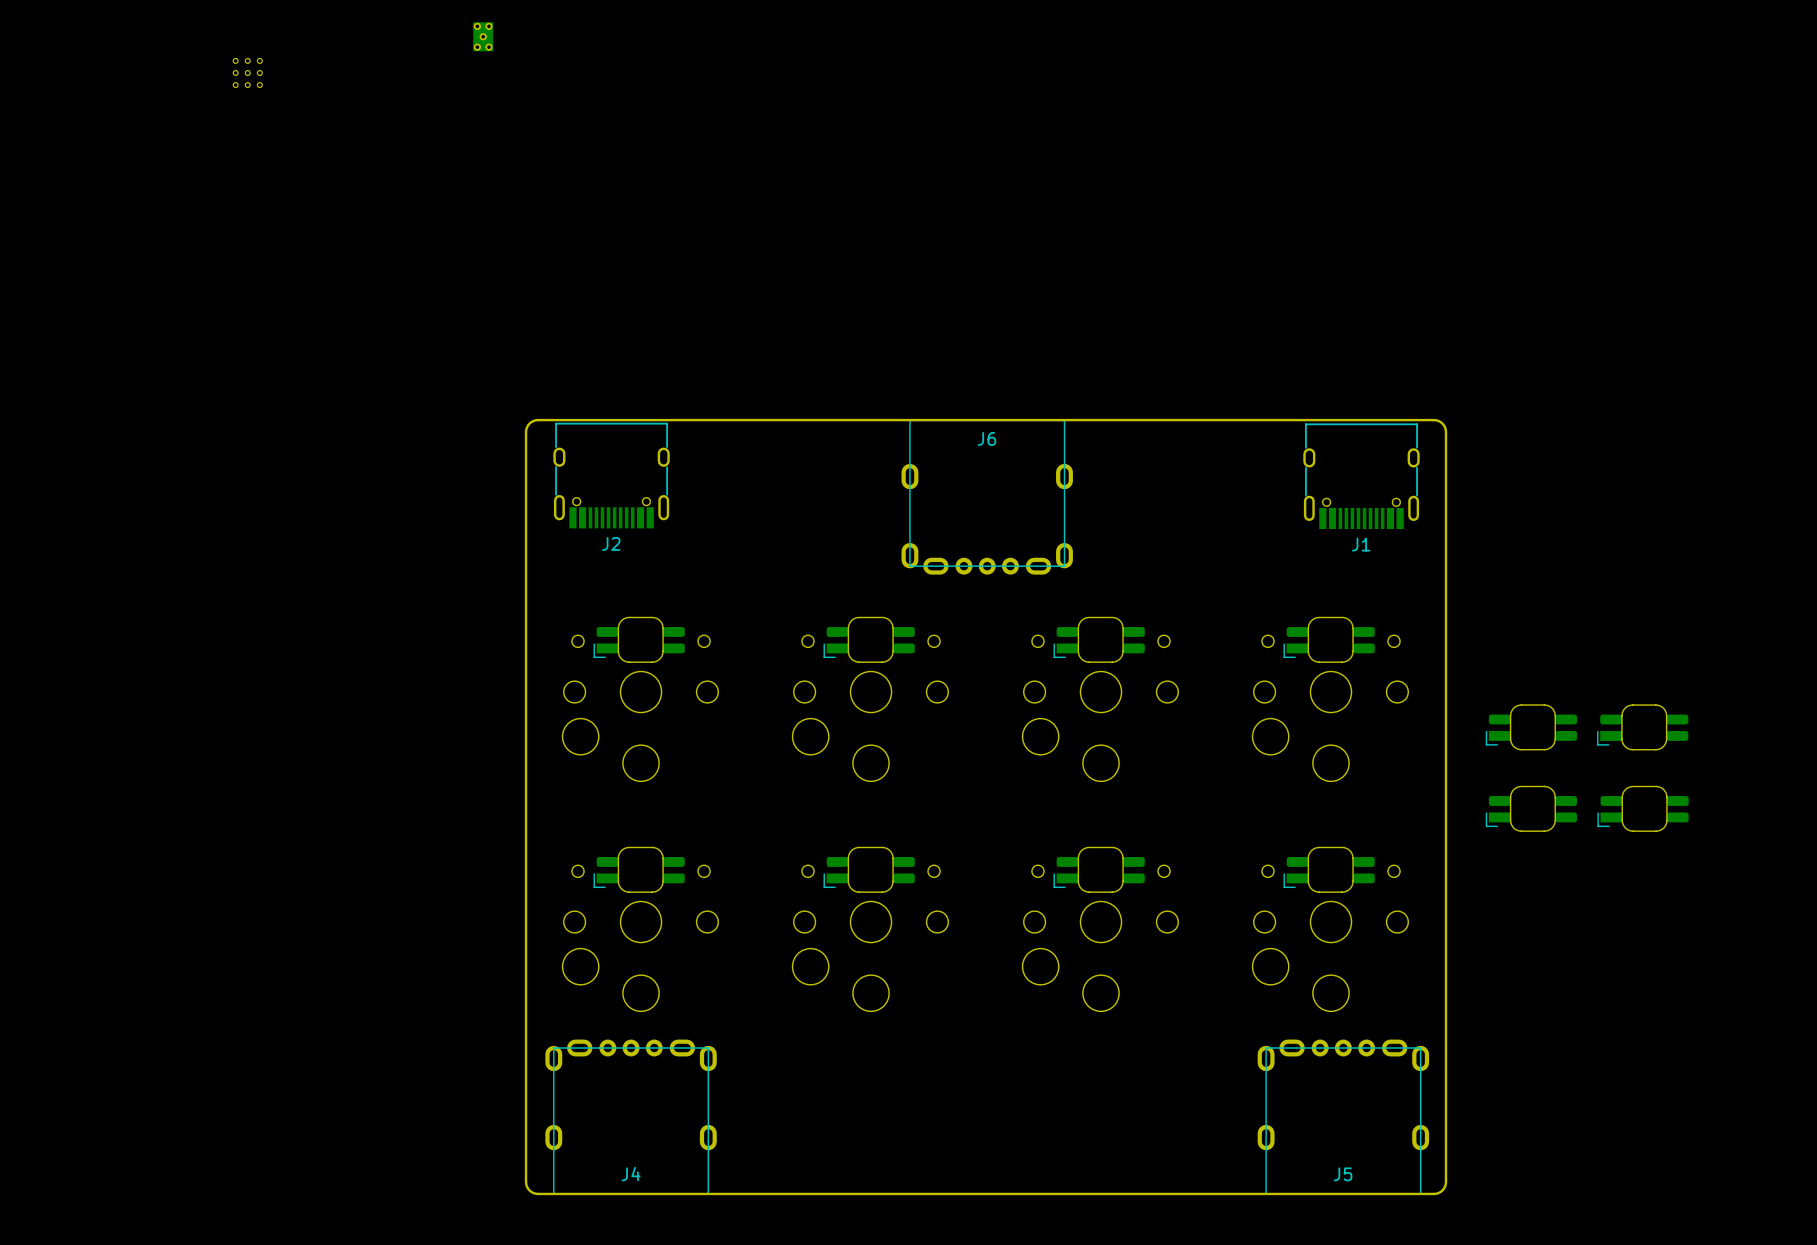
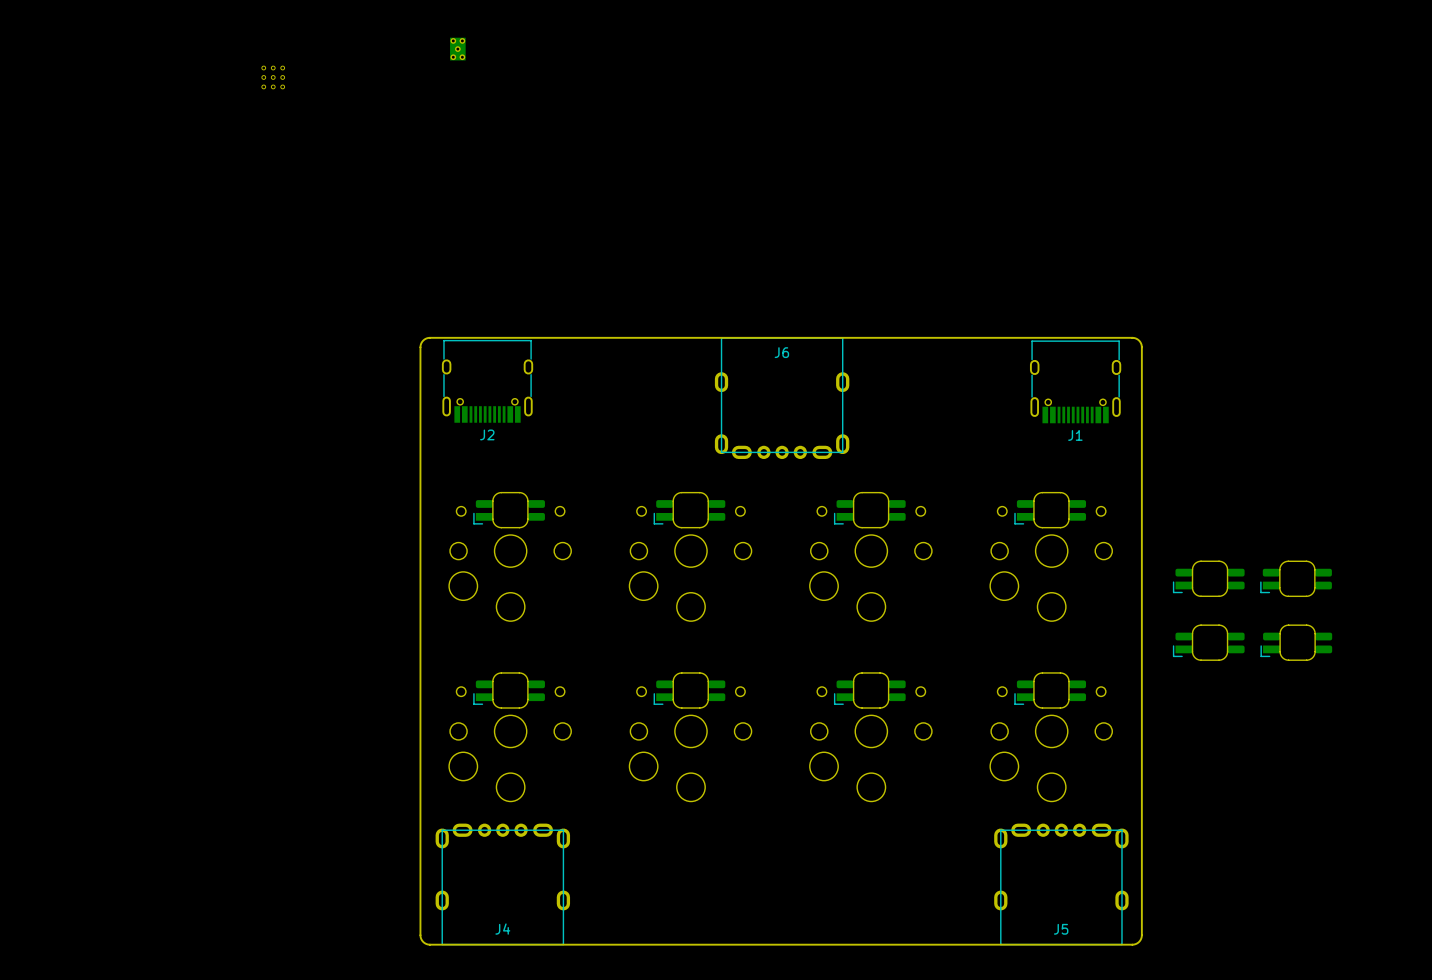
part position: (483, 36) -> (457, 49)
part position: (247, 72) -> (273, 77)

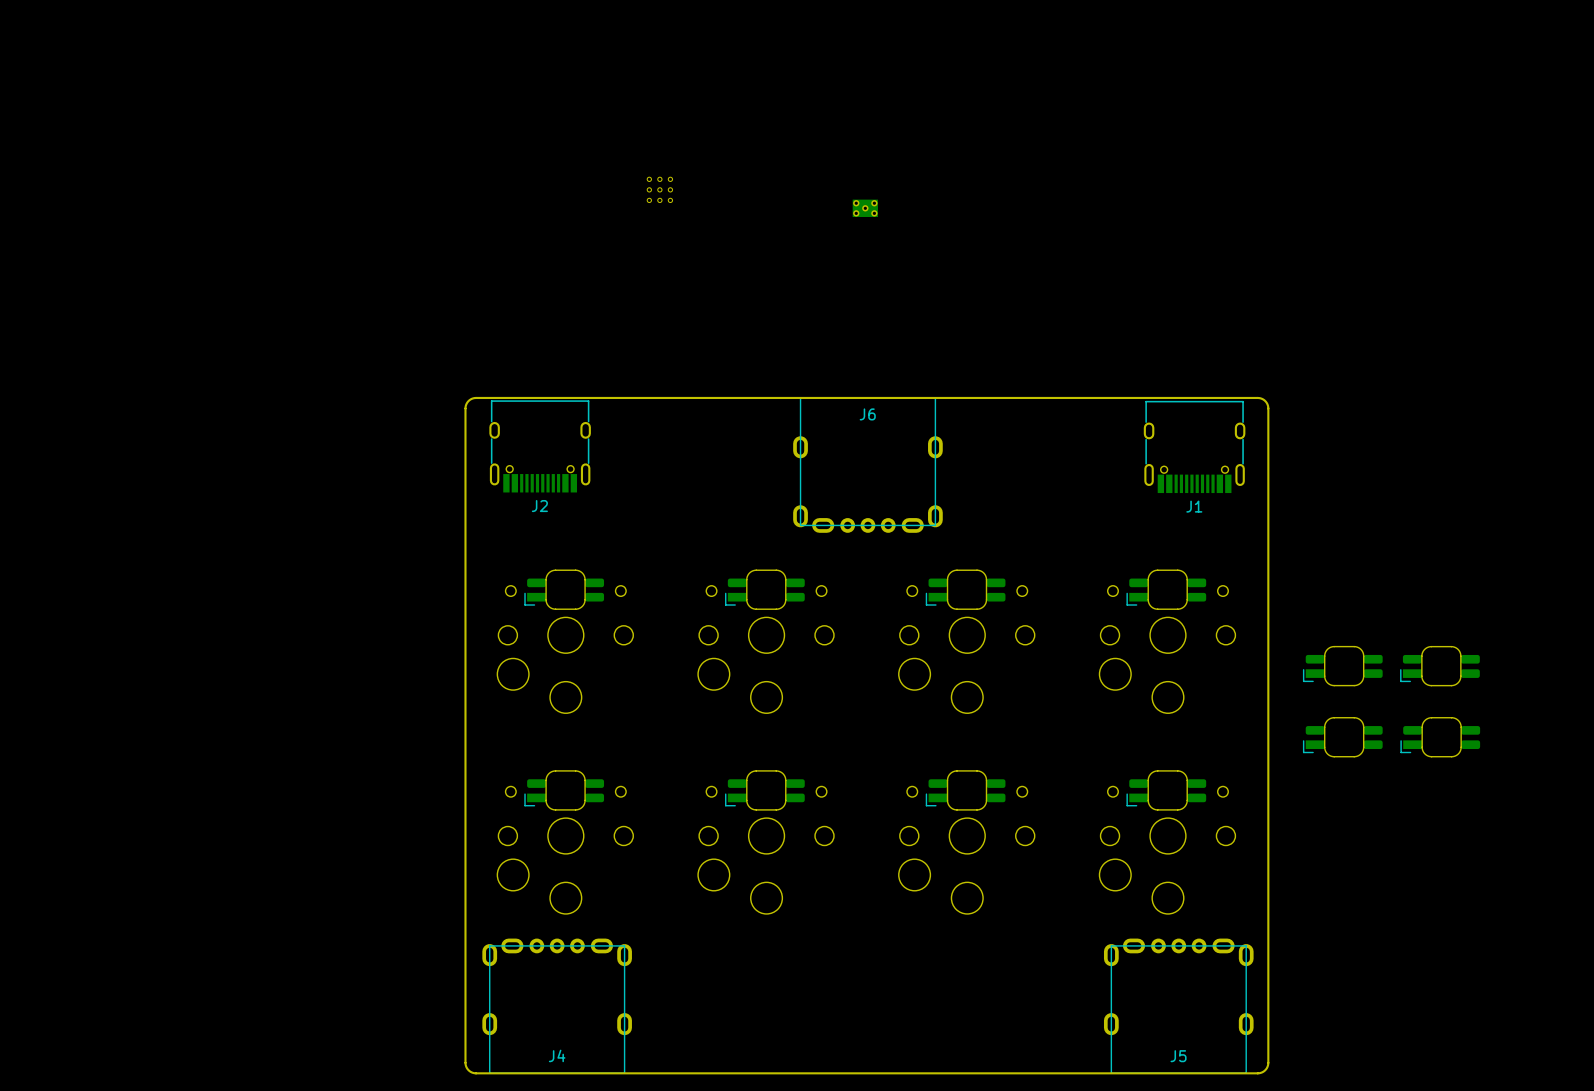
part: (457, 49) -> none
part: (273, 77) -> none
part: none -> (659, 189)
part: none -> (865, 208)

